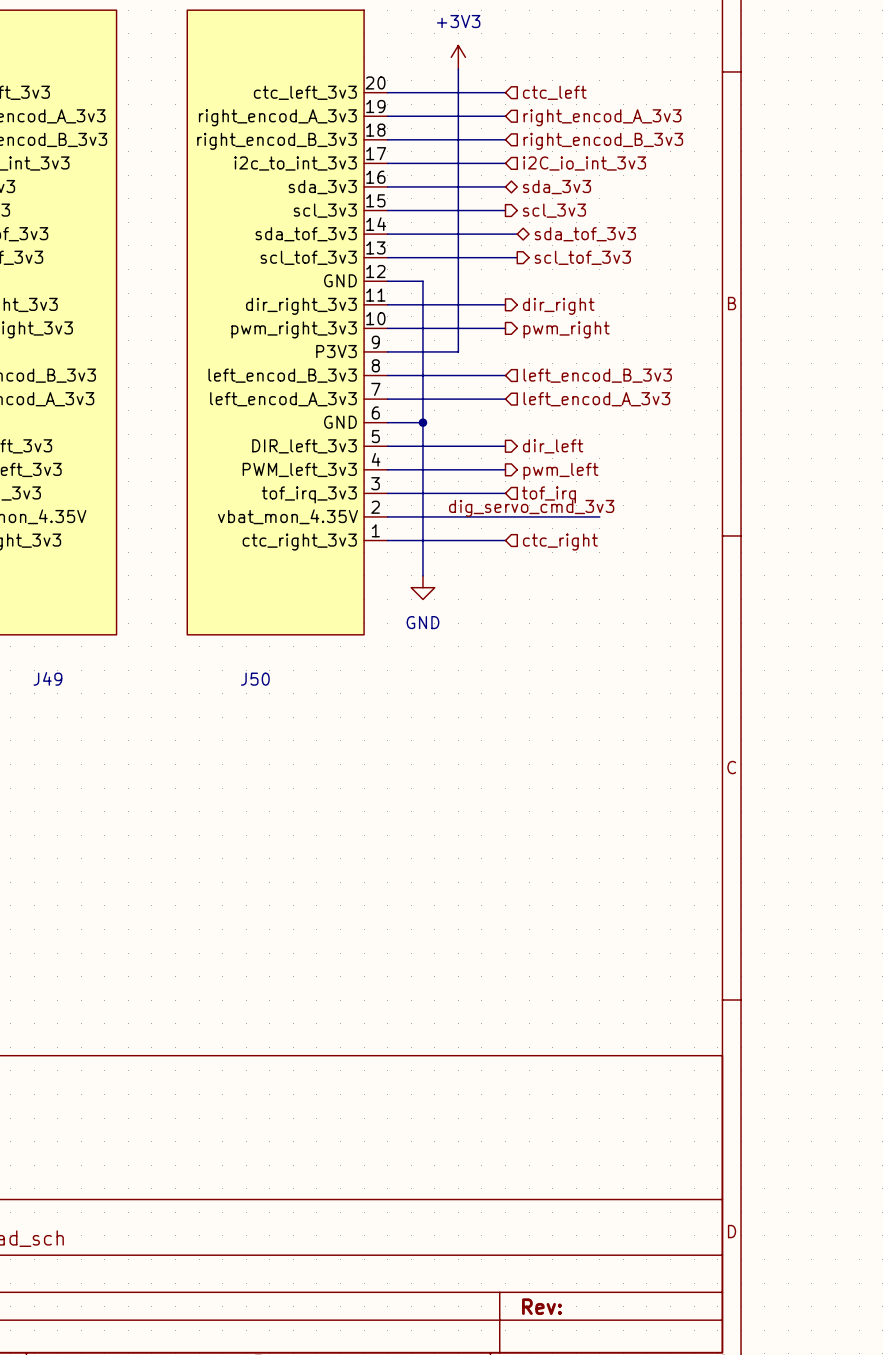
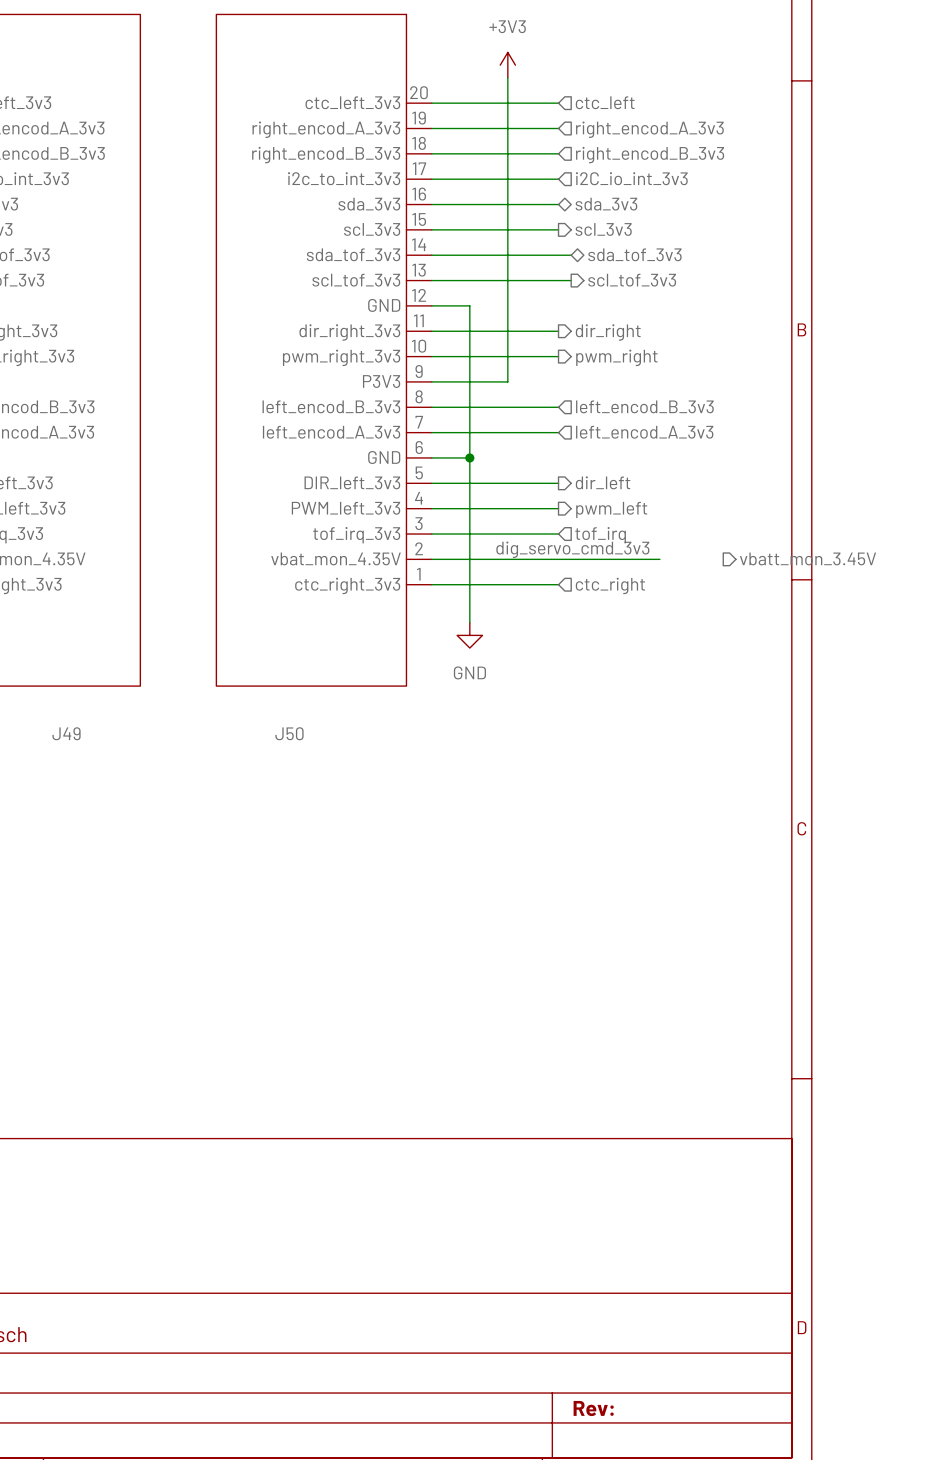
hierarchical label: none -> vbatt_mon_3.45V (808, 558)

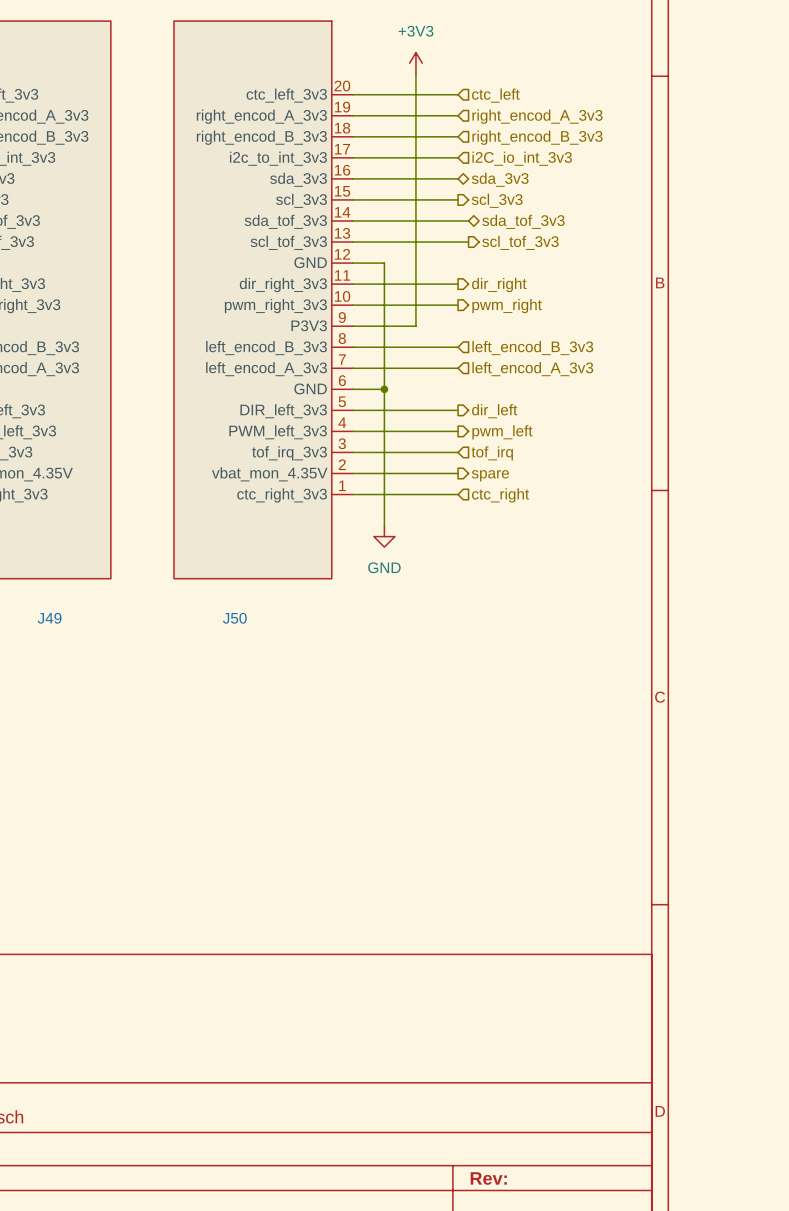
label: dig_servo_cmd_3v3 (572, 549) -> none
hierarchical label: vbatt_mon_3.45V (808, 558) -> none
wire: (558, 559) (659, 559) -> none
hierarchical label: none -> spare (490, 475)

